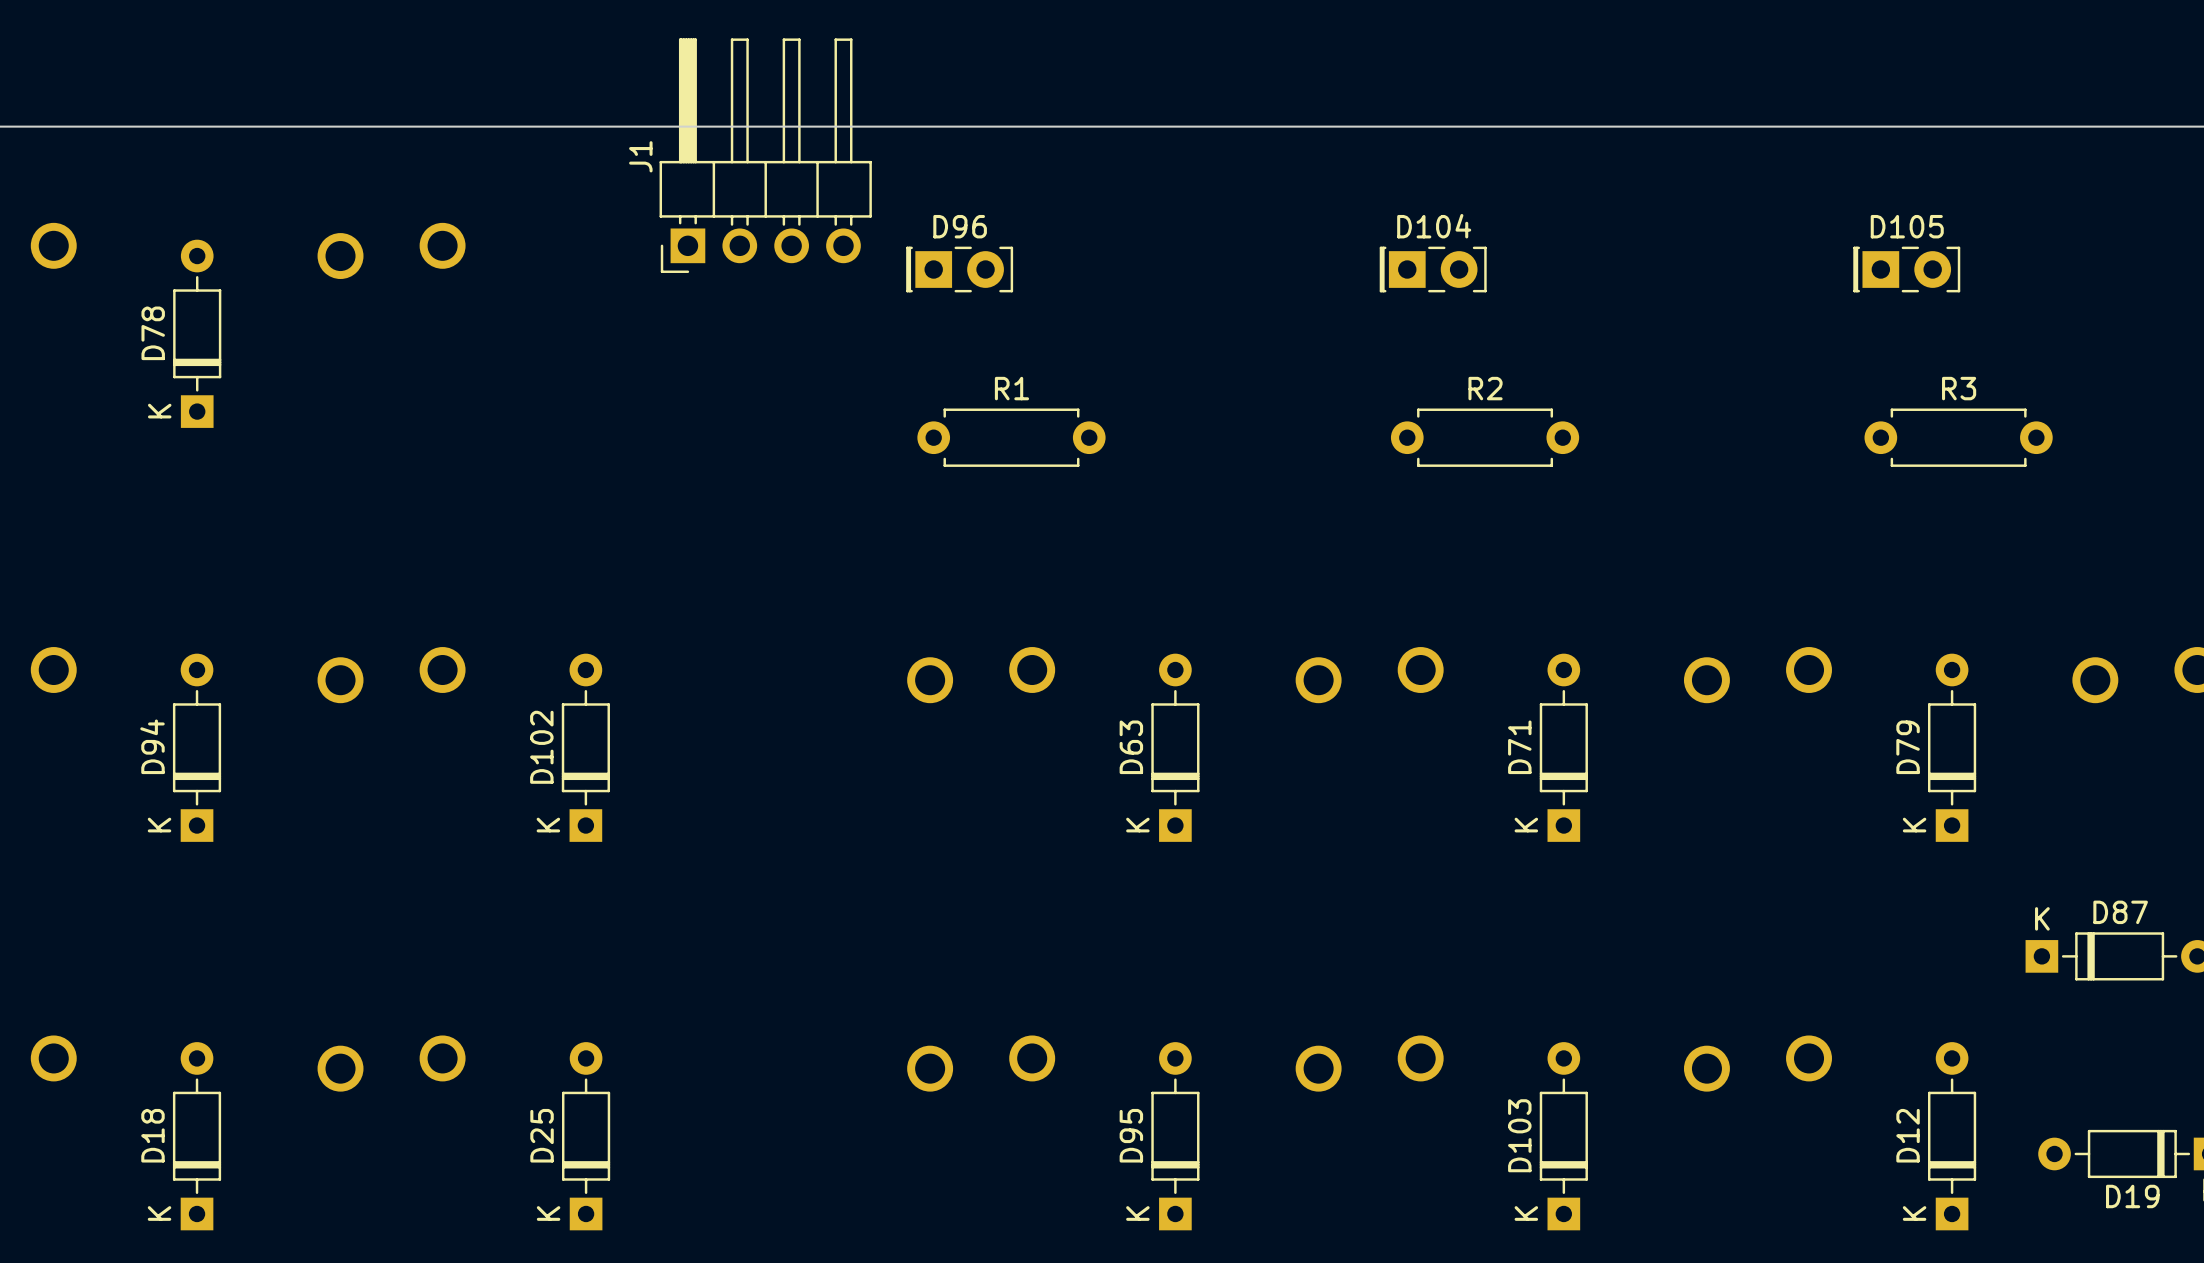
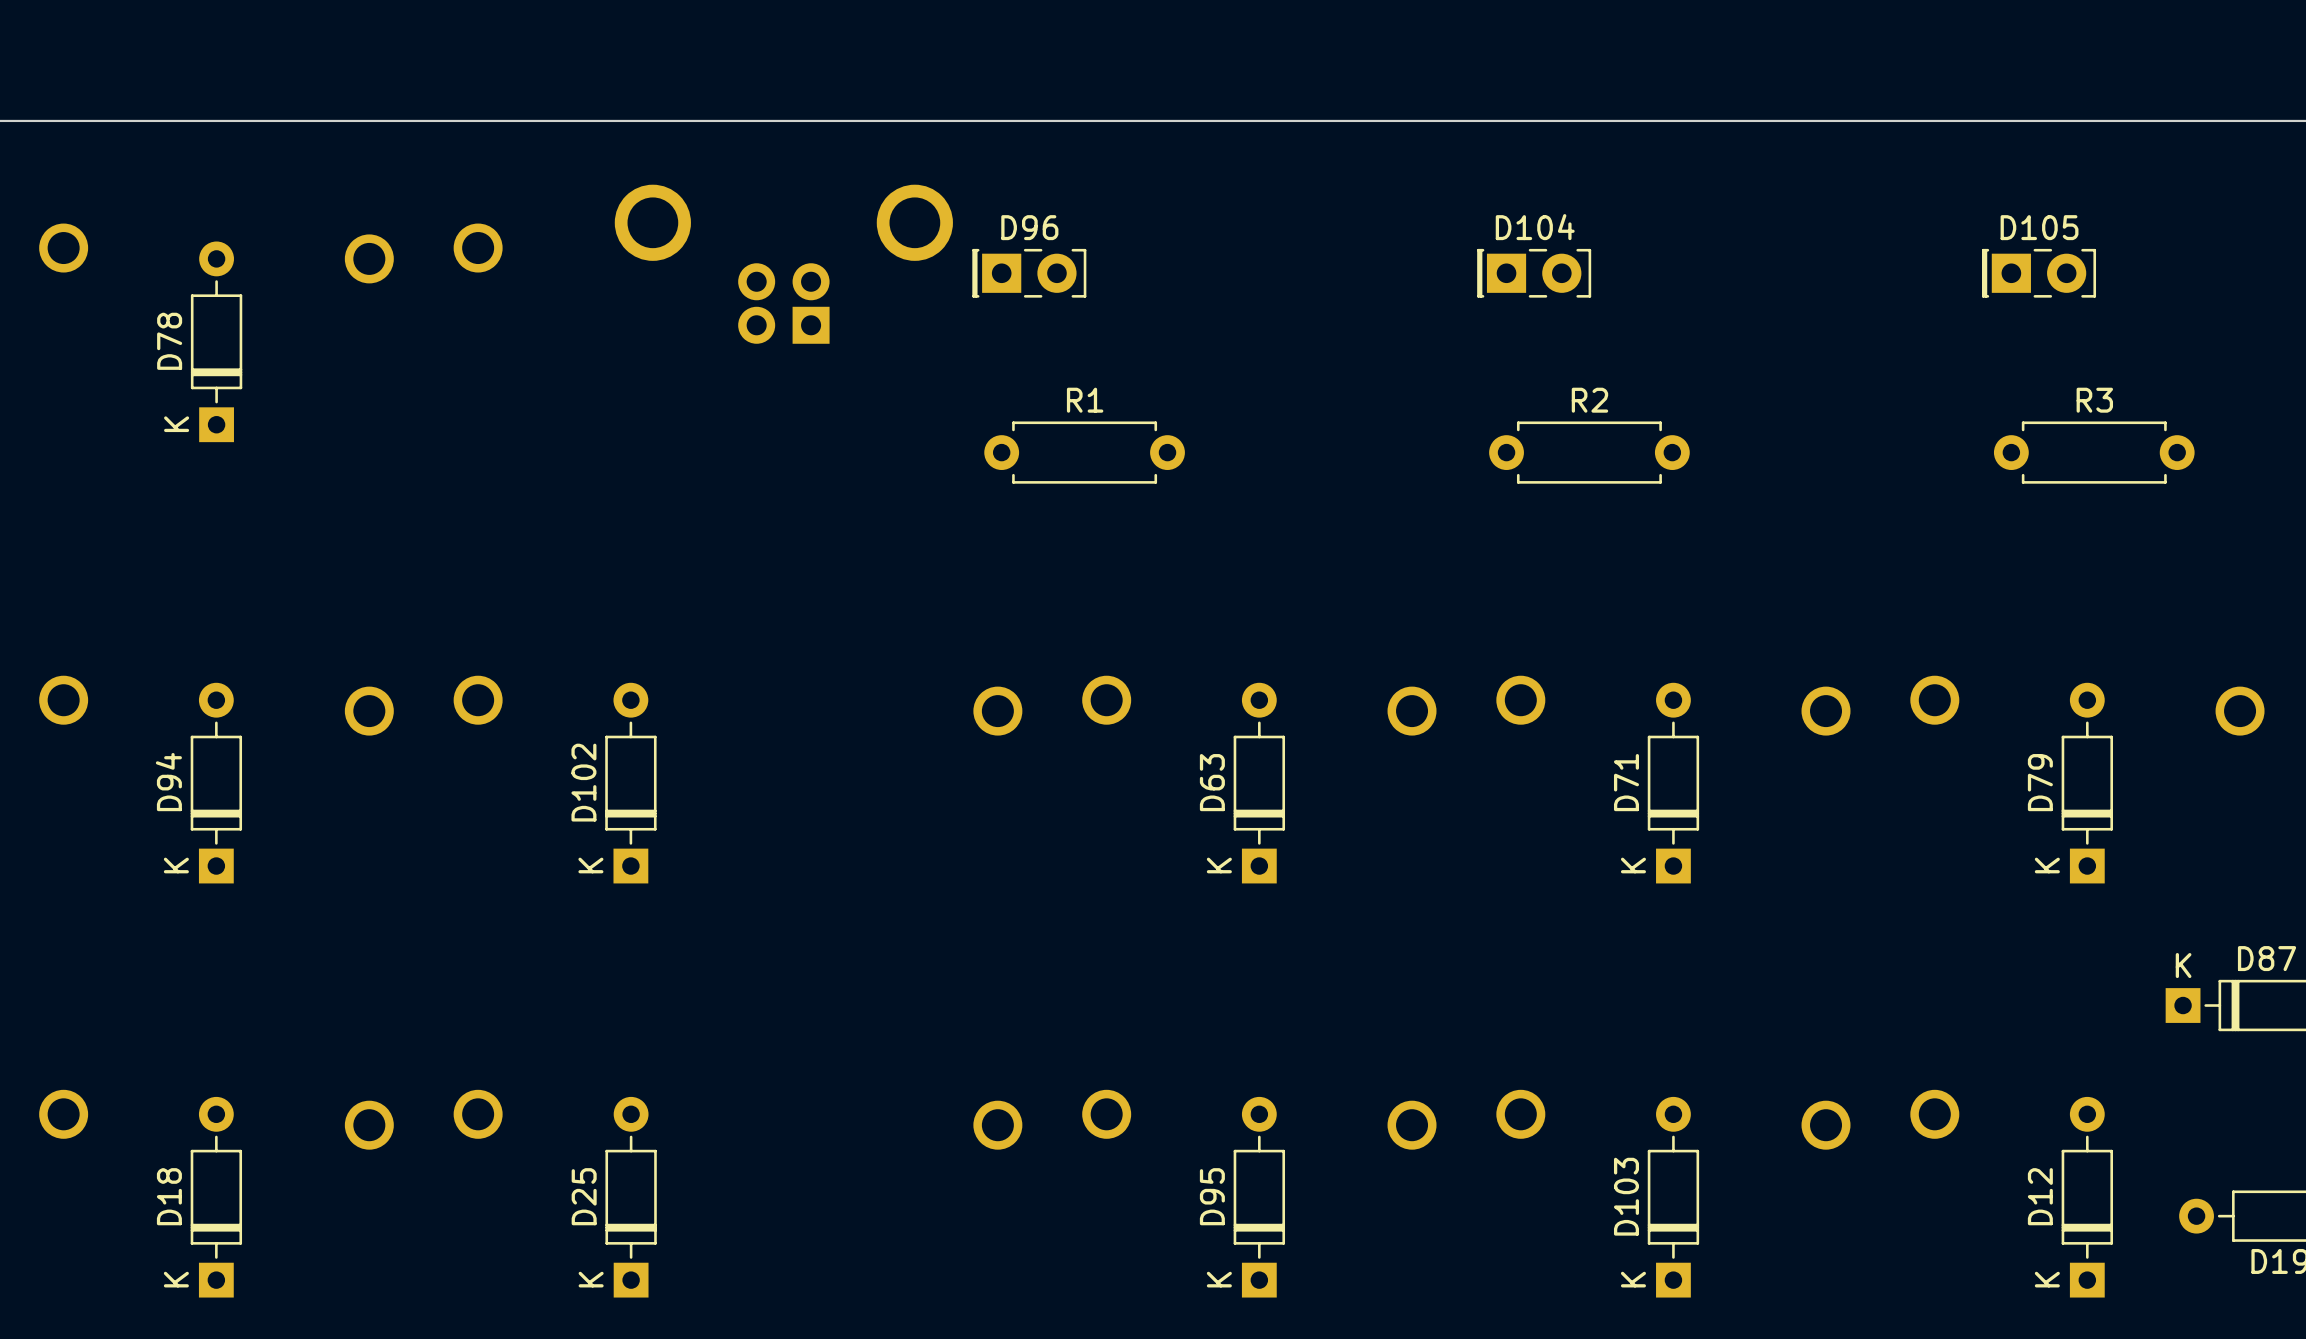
J1: (765, 155) -> none
part: none -> (783, 264)

